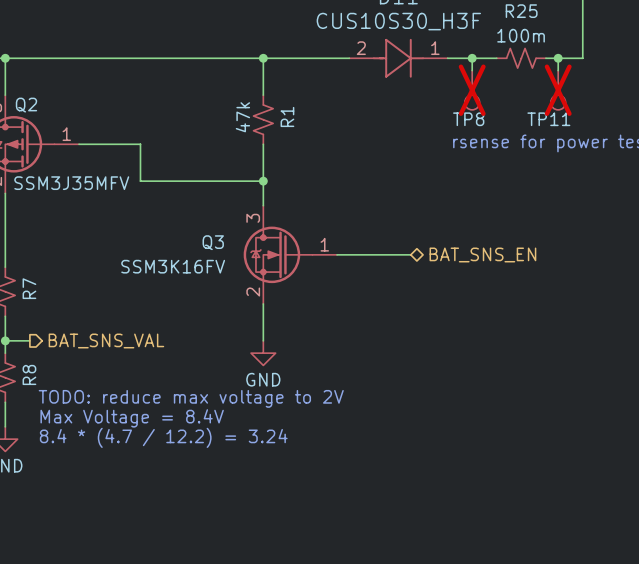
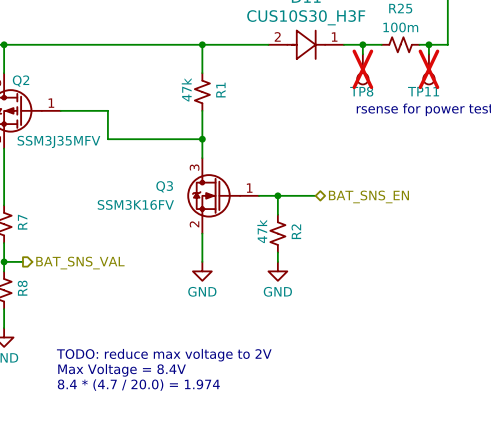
wire: none -> (277, 195) (277, 214)
junction: none -> (277, 195)
R2: none -> 47k (277, 233)
wire: none -> (277, 252) (277, 261)
power symbol: none -> GND (277, 271)
text position: TODO: reduce max voltage to 2V (191, 398) -> TODO: reduce max voltage to 2V (164, 355)
text position: Max Voltage = 8.4V (132, 418) -> Max Voltage = 8.4V (122, 370)
text: 8.4 * (4.7 / 12.2) = 3.24 (163, 437) -> none
text: none -> 8.4 * (4.7 / 20.0) = 1.974 (138, 385)

